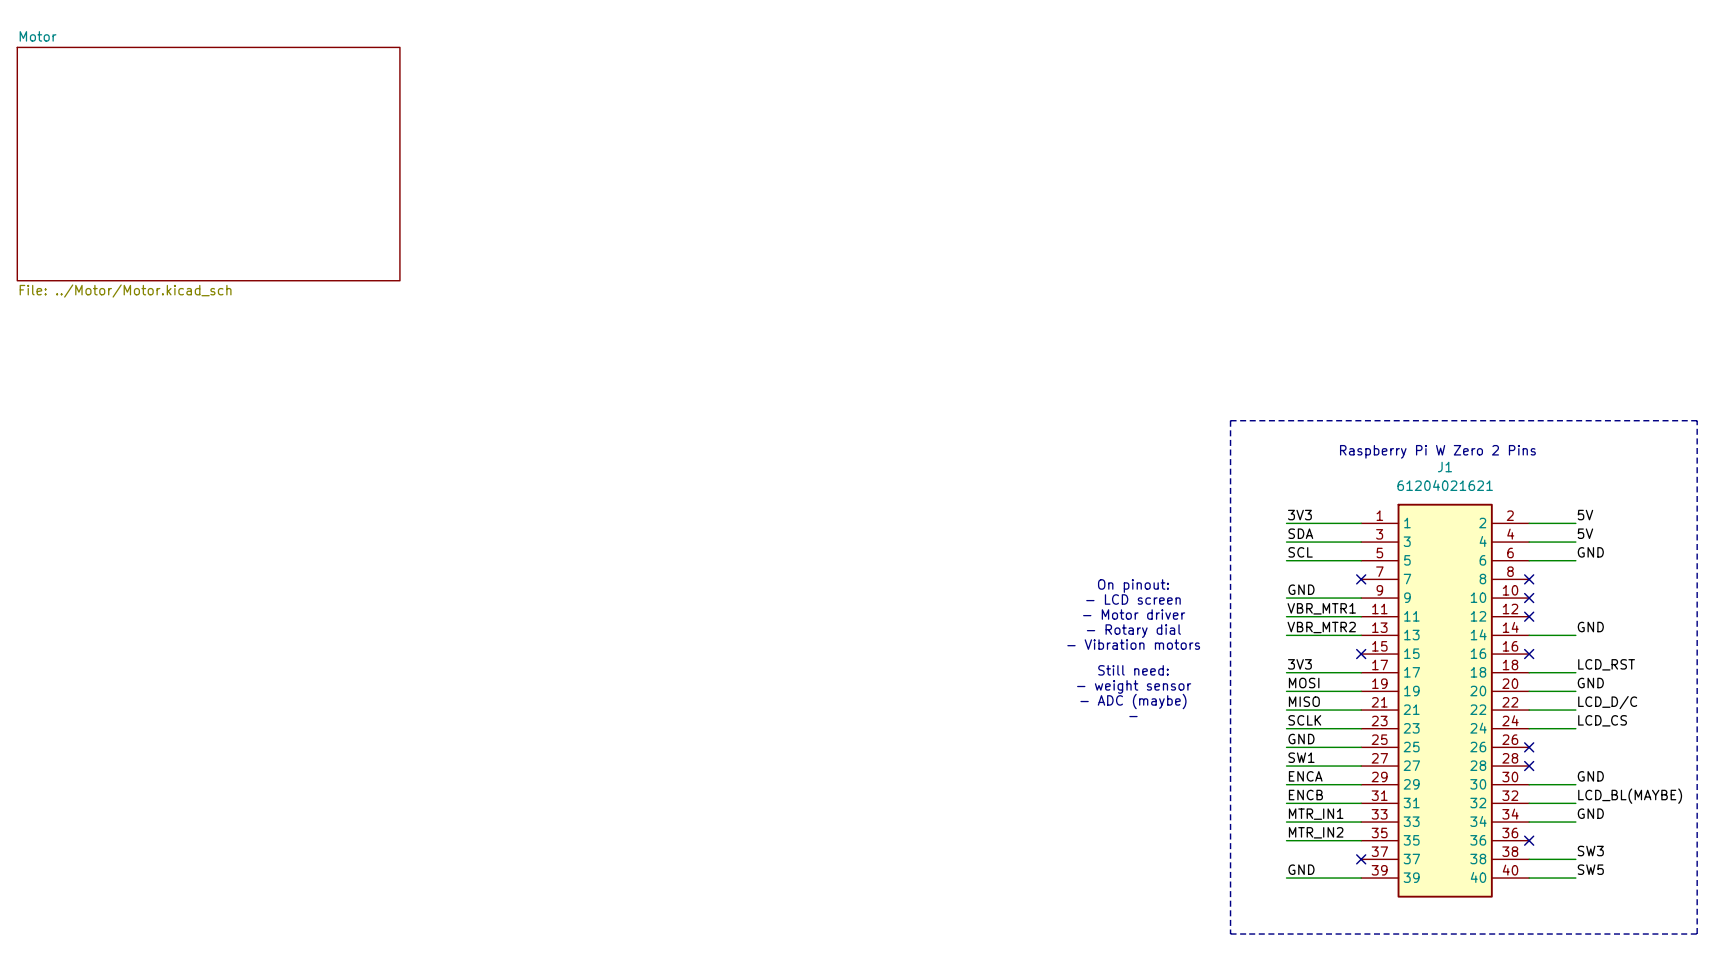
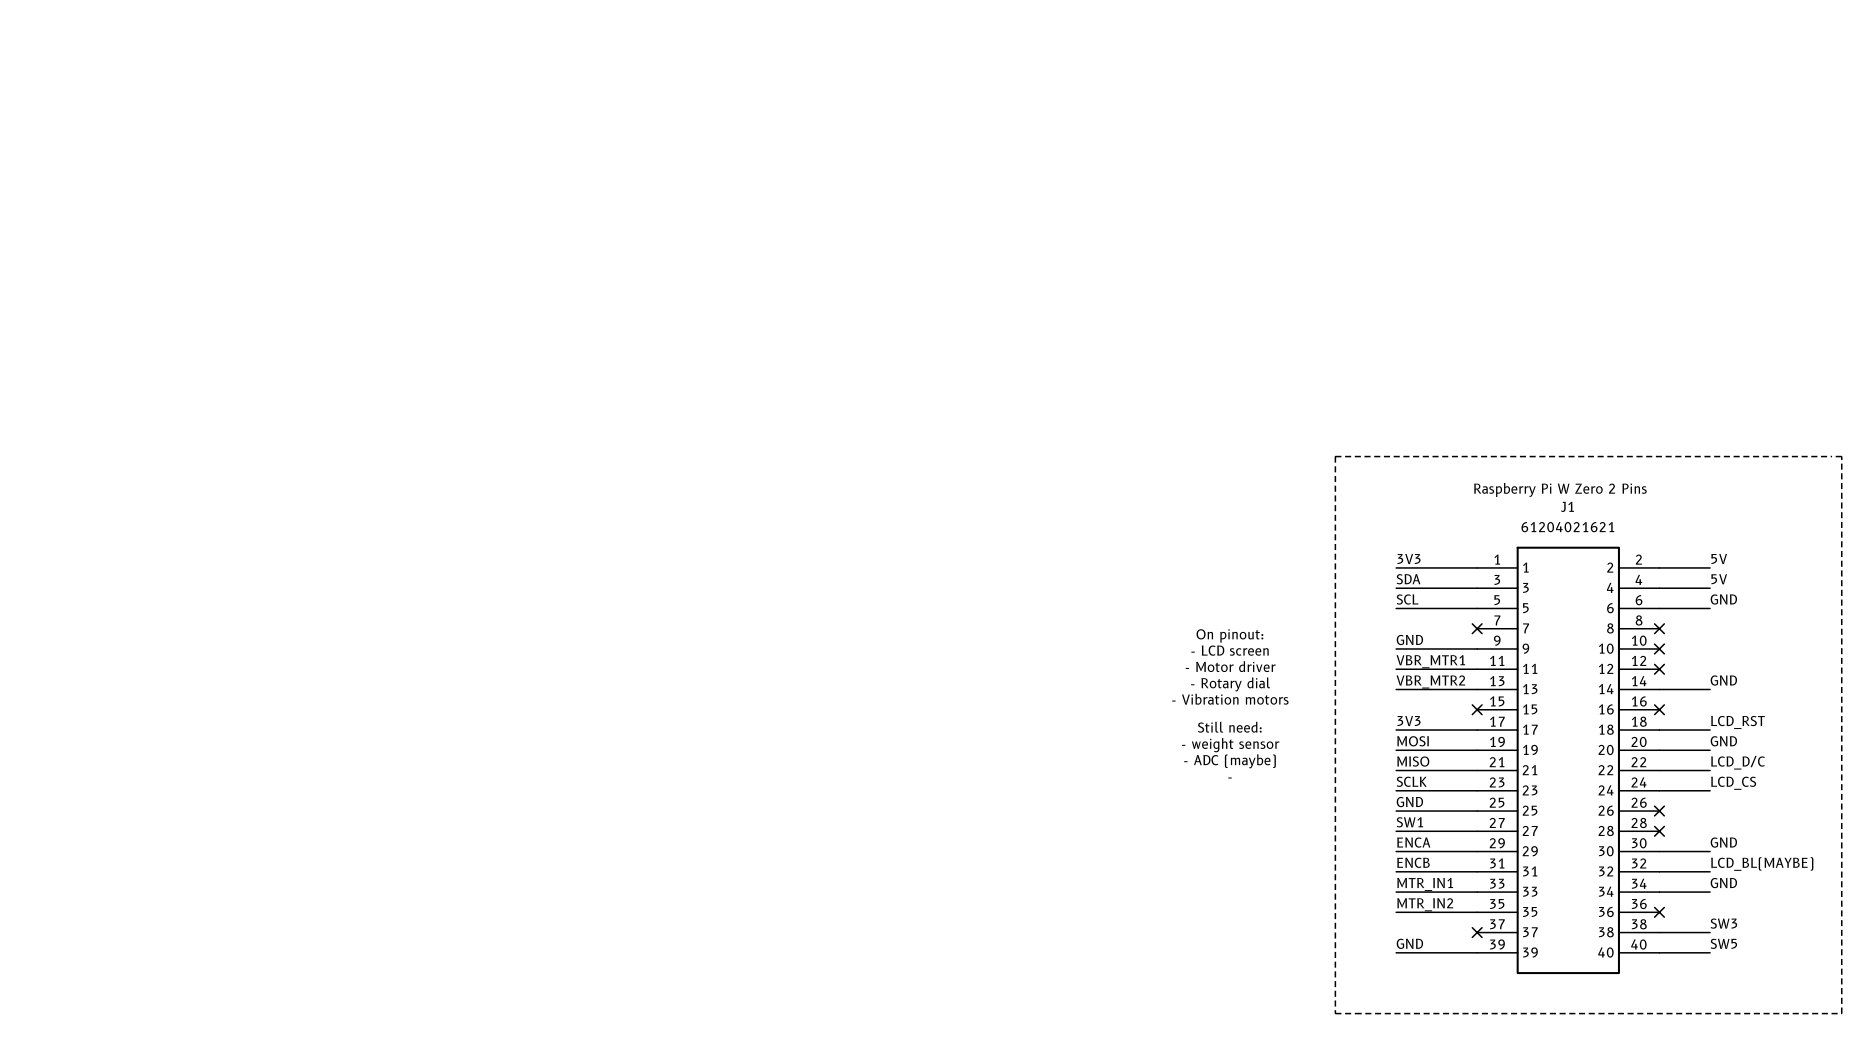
sheet Motor: File: ../Motor/Motor.kicad_sch (208, 164) -> none

